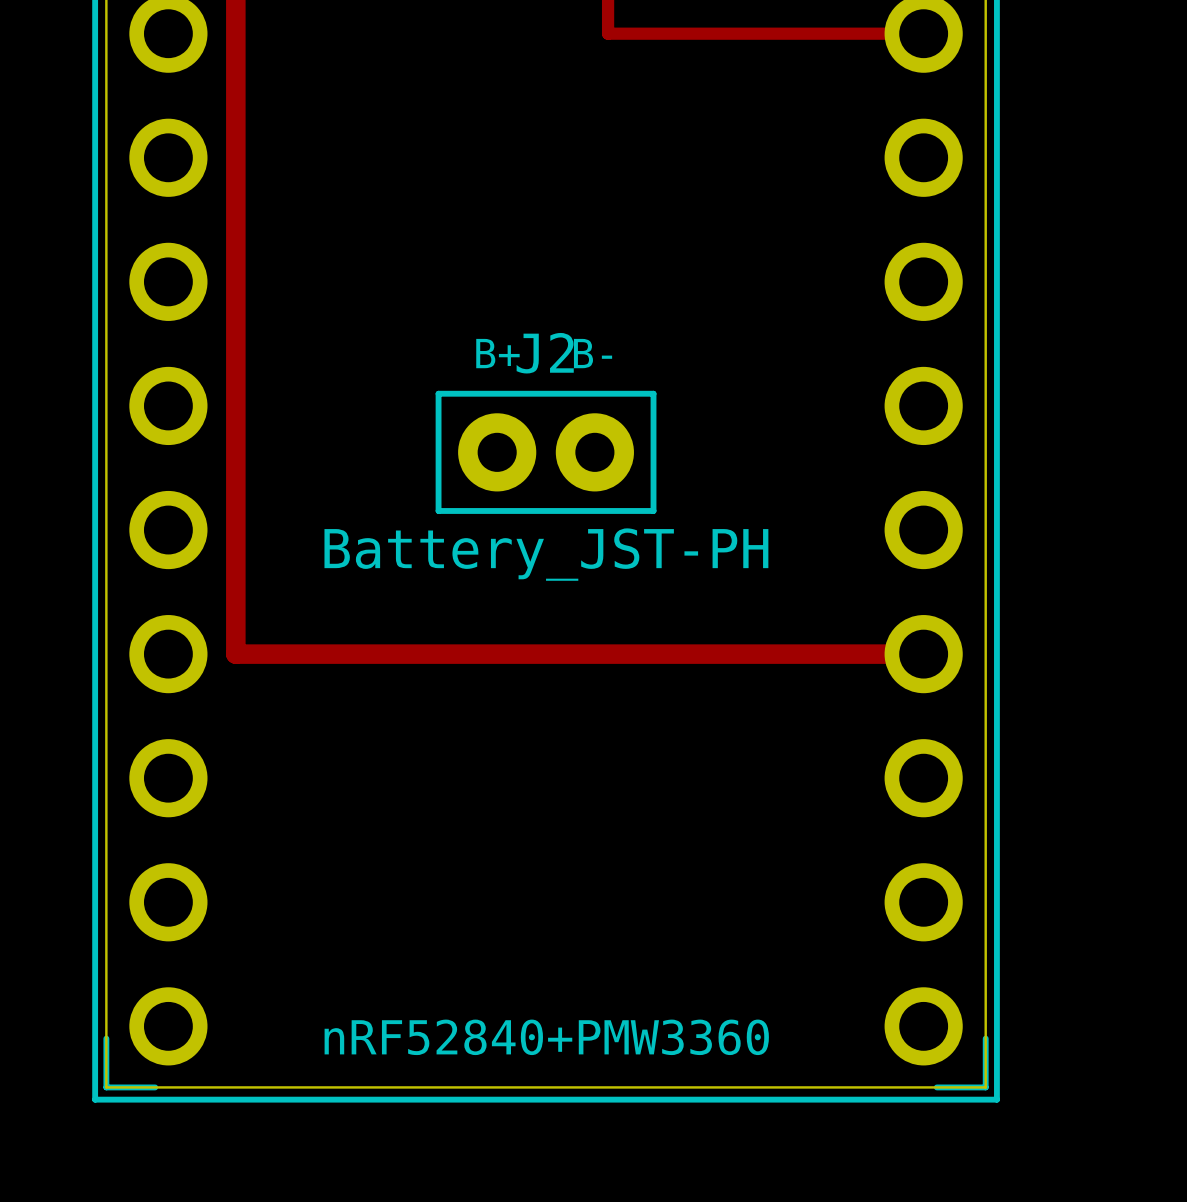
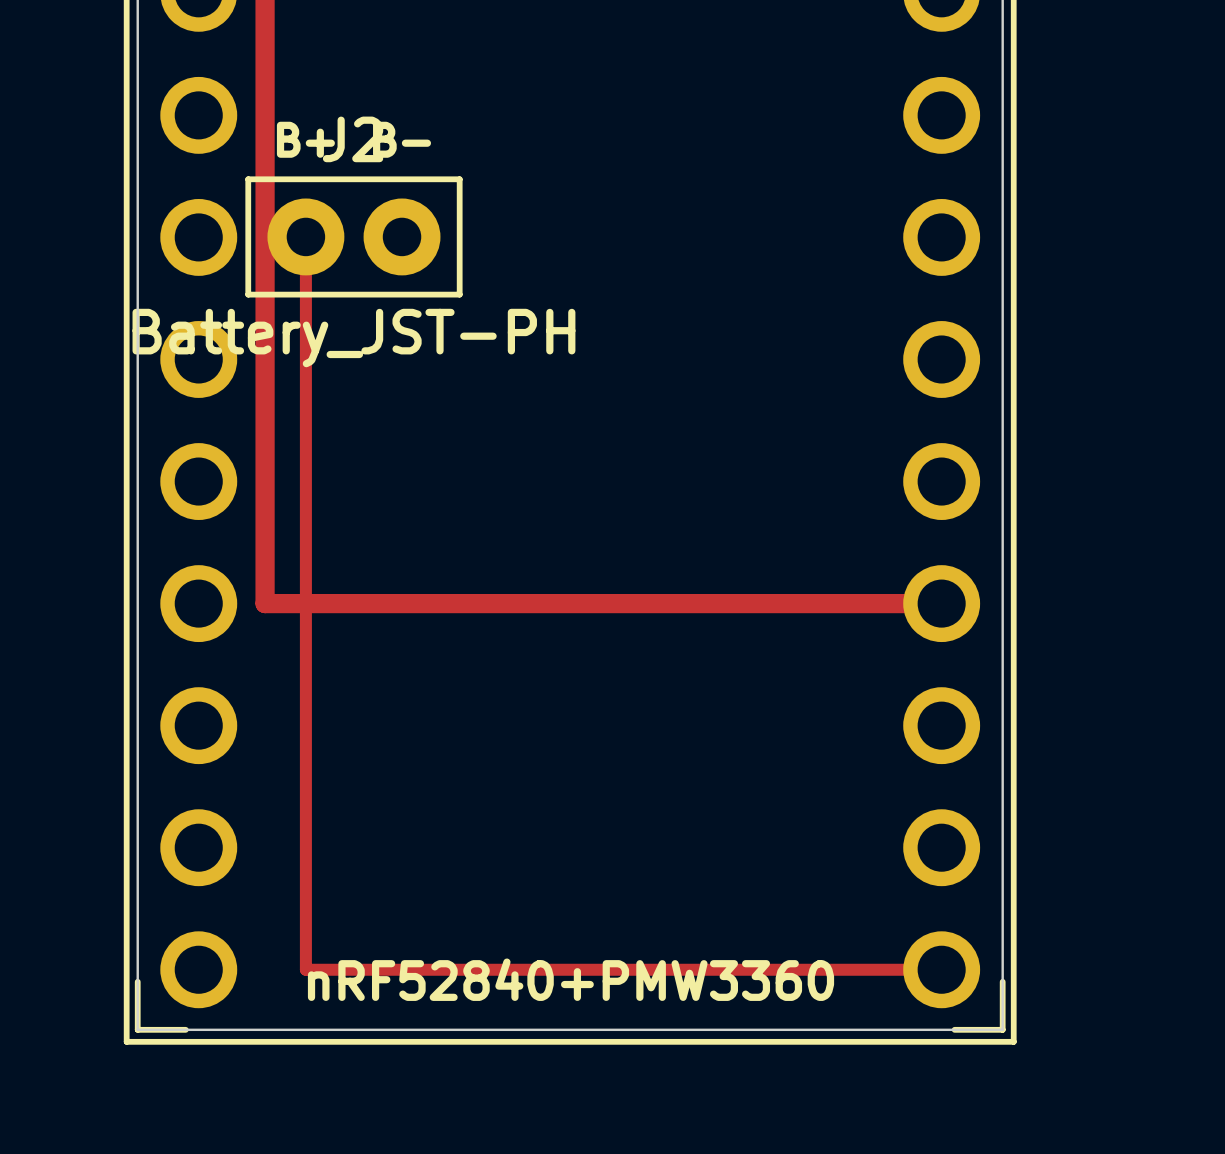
track: none -> (305, 236) (305, 969) (941, 969)
J2 position: (546, 452) -> (353, 236)

